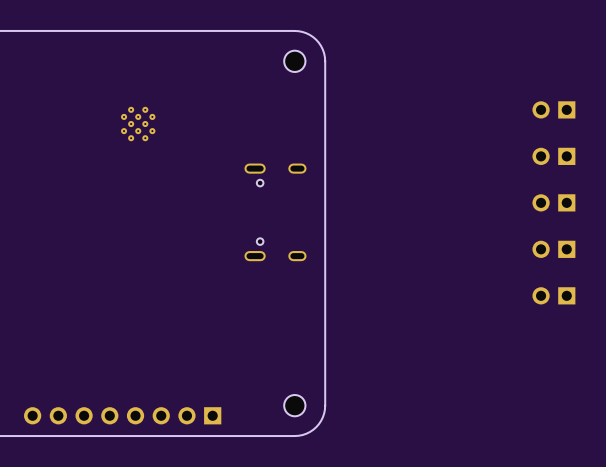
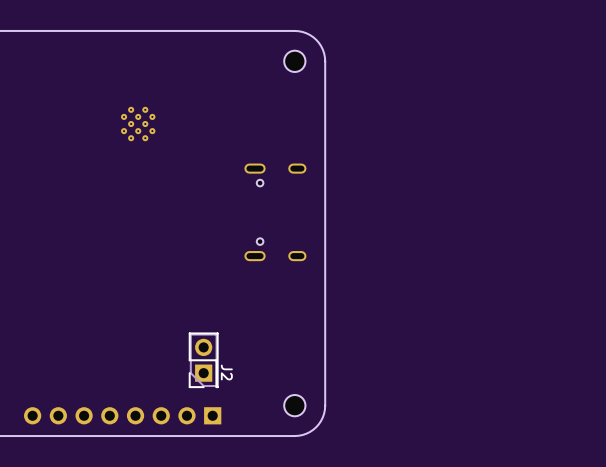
part: (553, 109) -> none
part: (553, 156) -> none
part: (553, 202) -> none
part: (553, 249) -> none
part: (553, 295) -> none
J2: none -> (203, 360)

